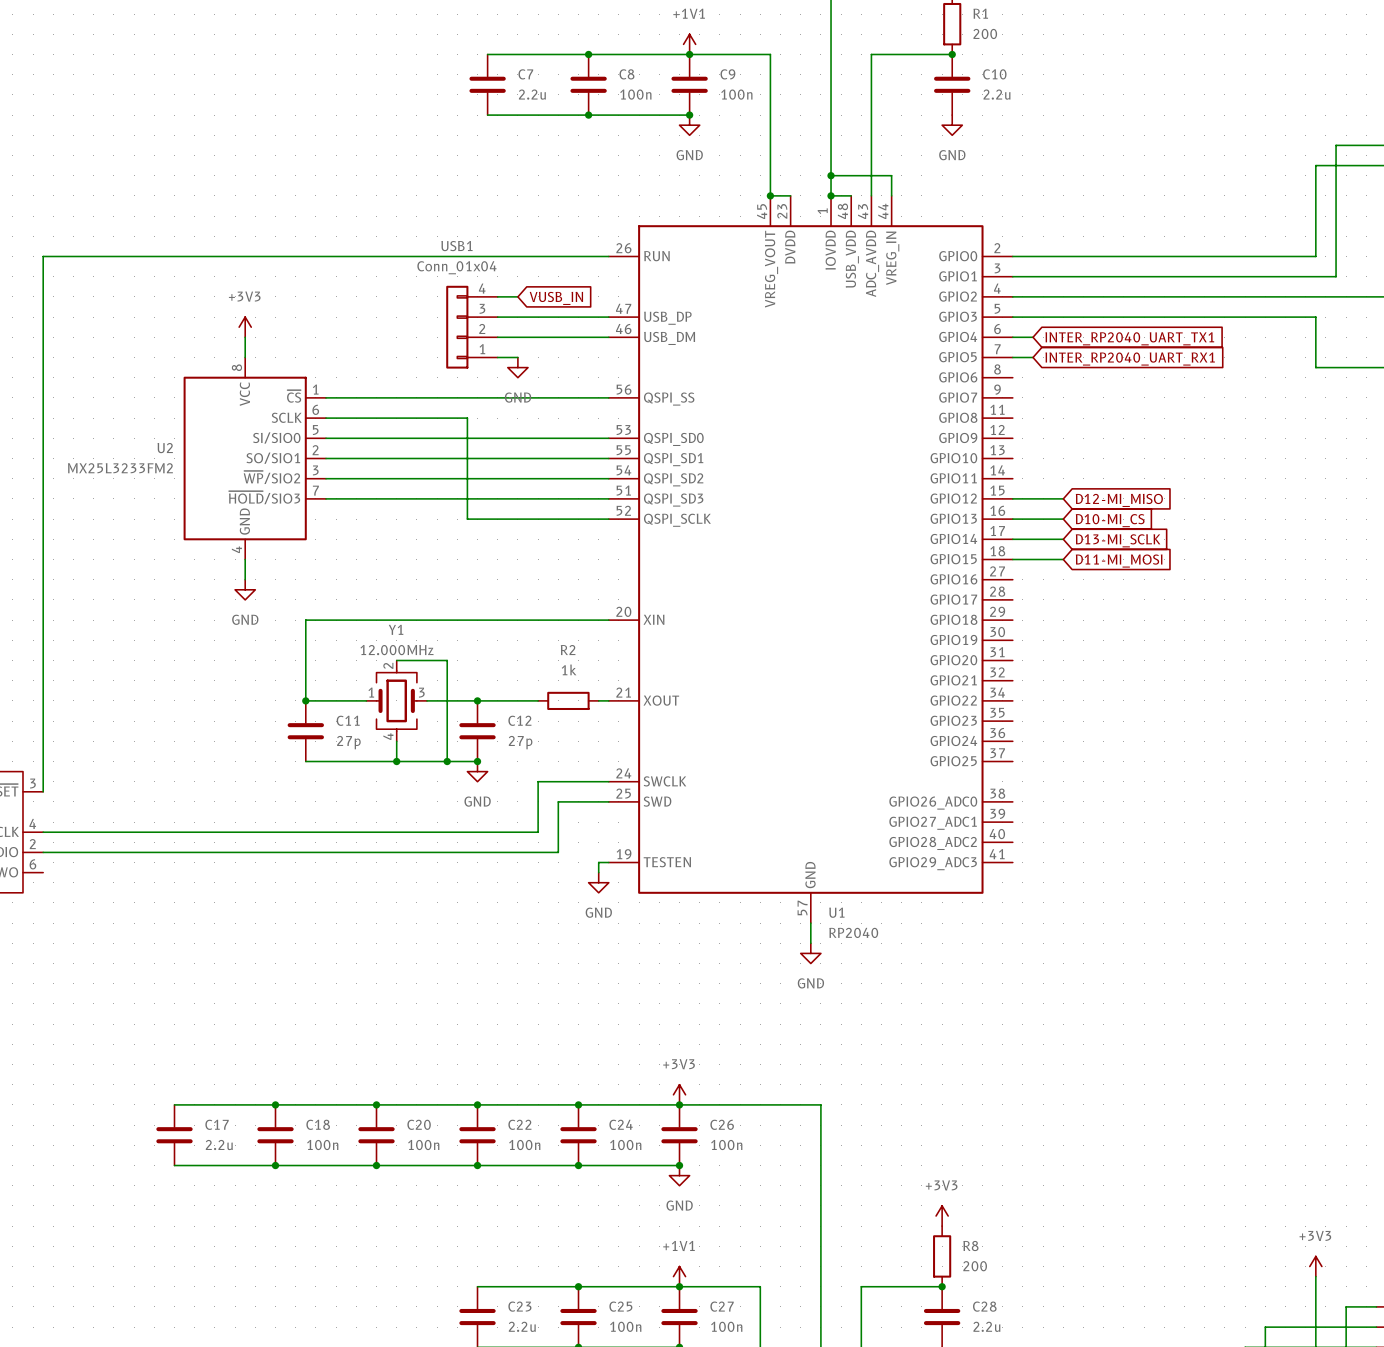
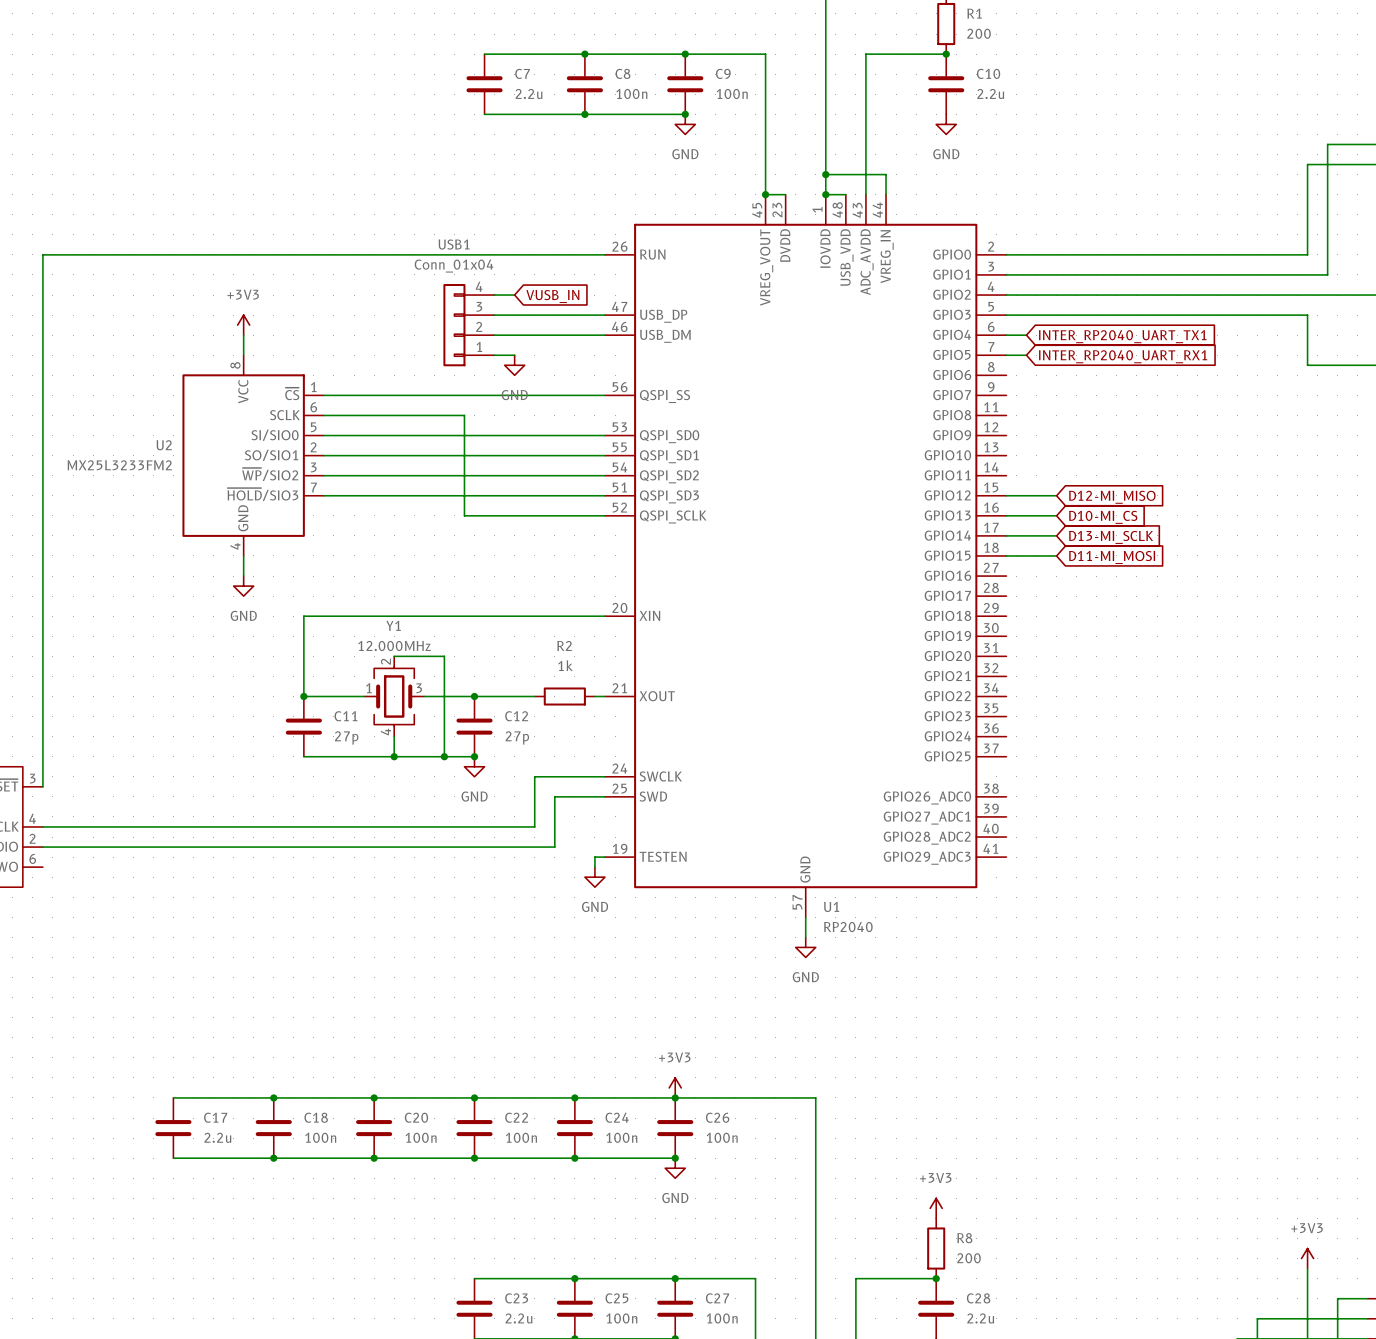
power symbol: +1V1 (689, 44) -> none
power symbol: +1V1 (679, 1276) -> none

